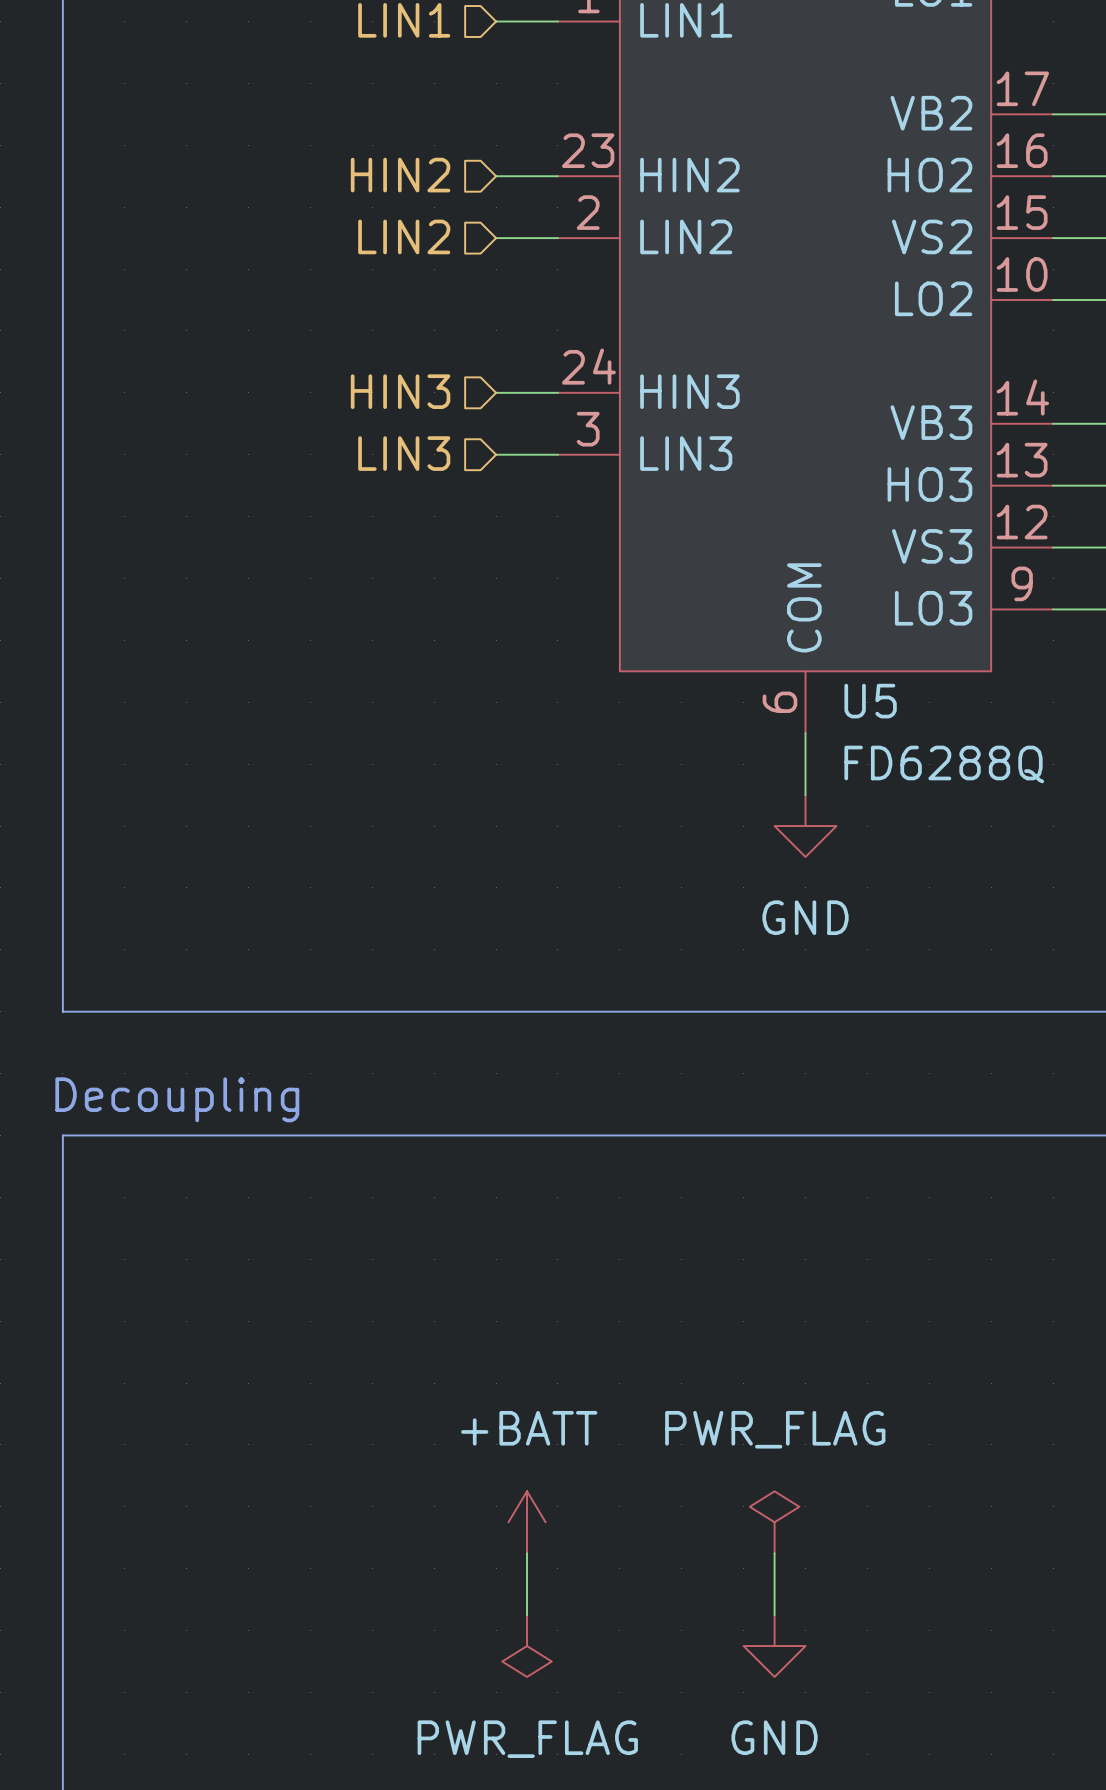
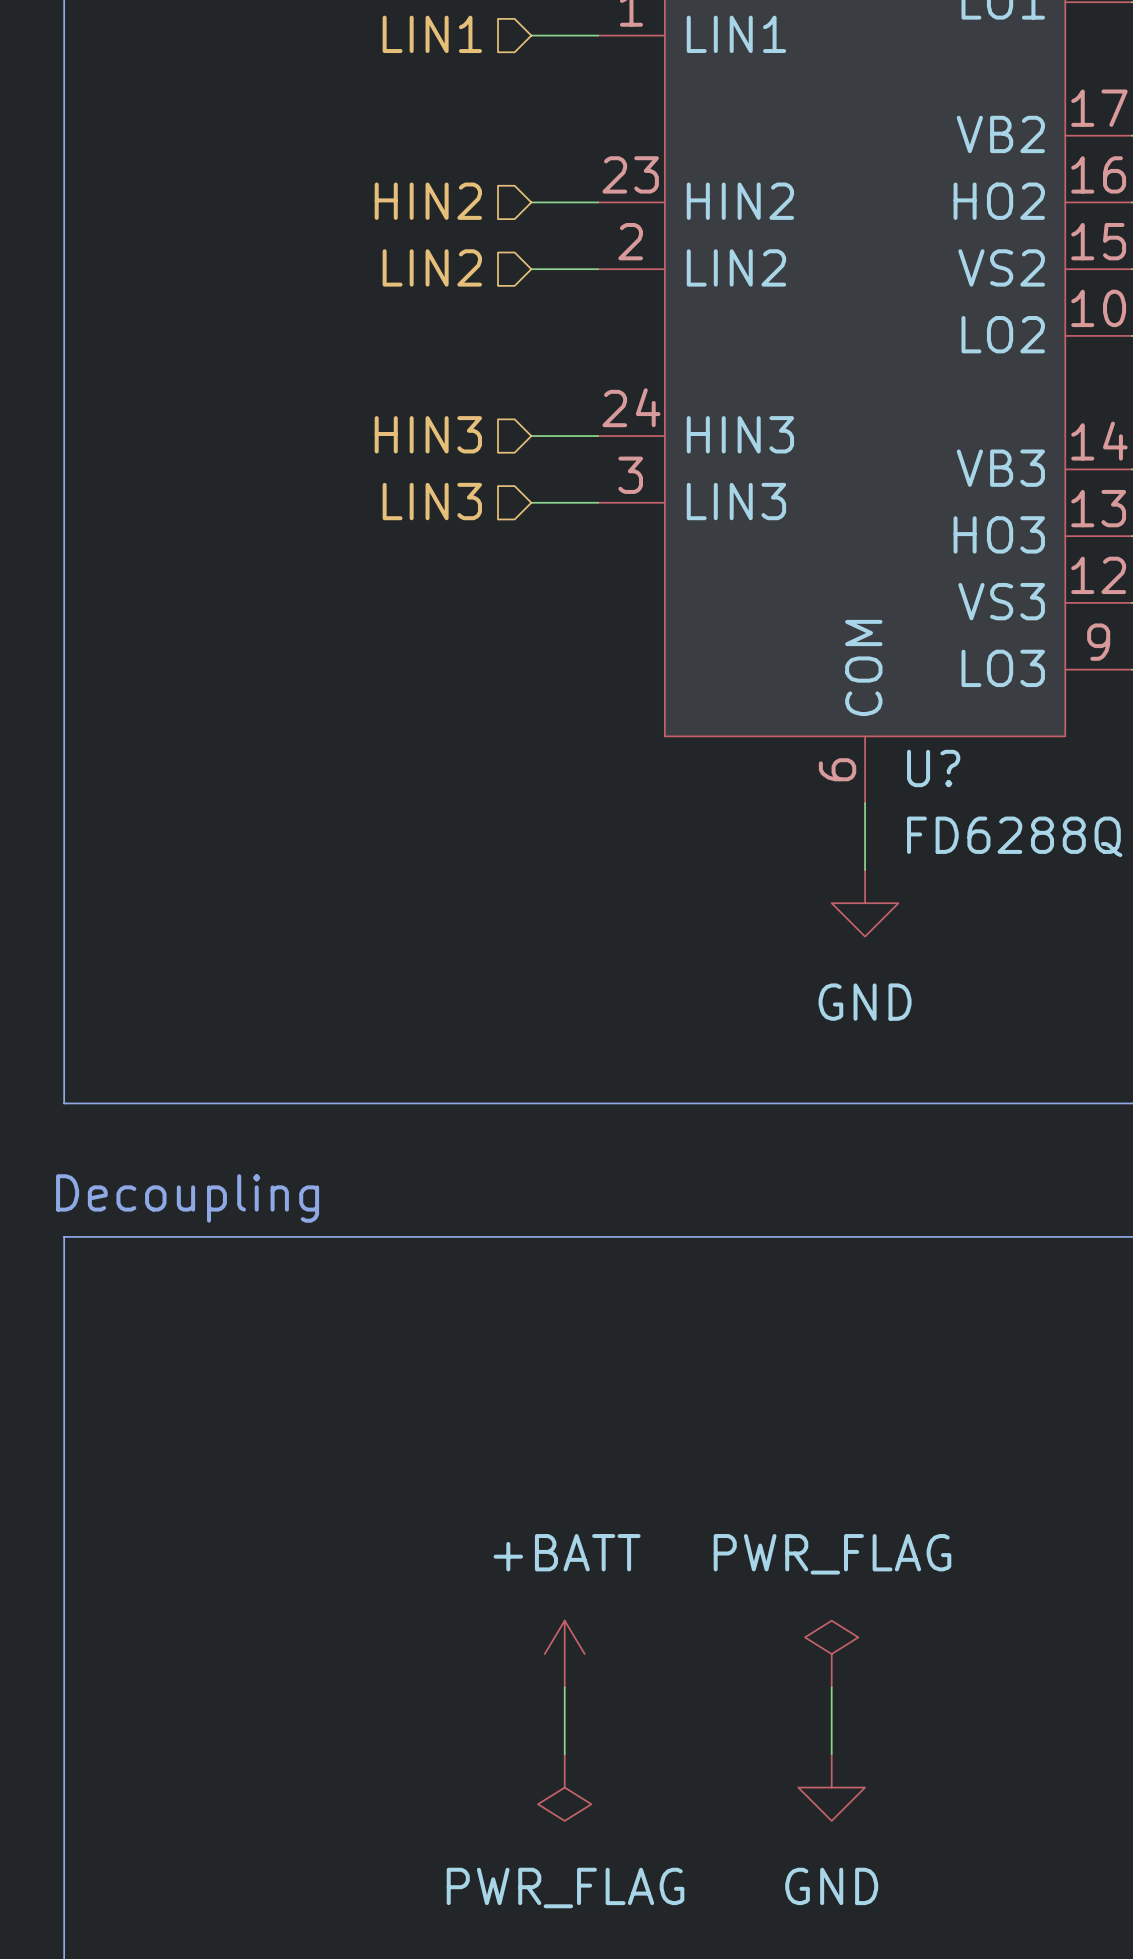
U5 name: U5 (870, 701) -> U? (933, 768)

